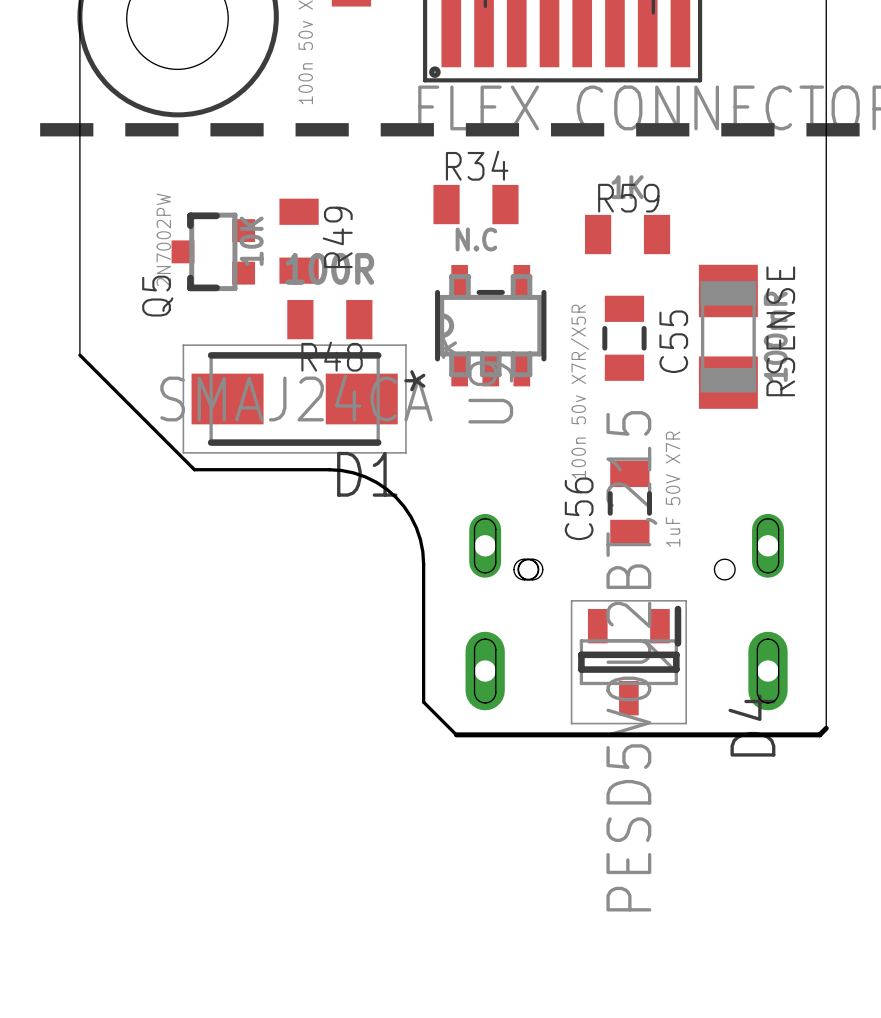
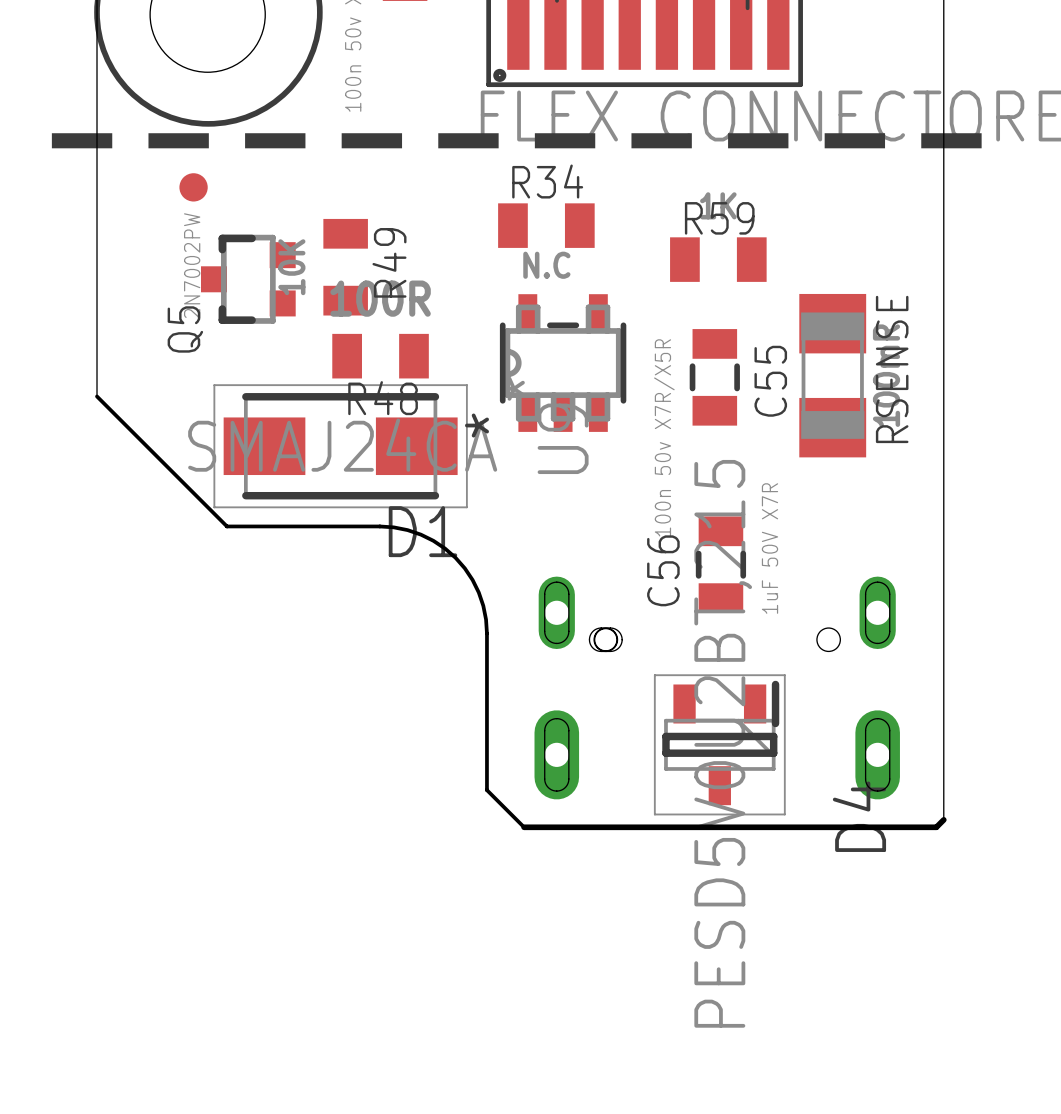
part: none -> (193, 187)

